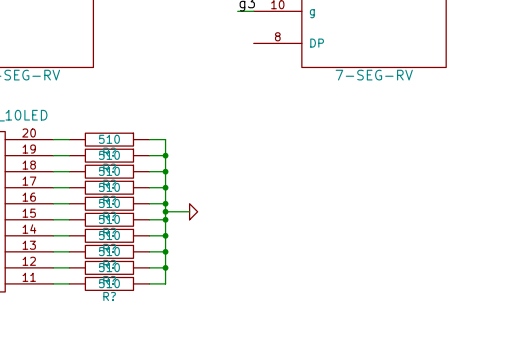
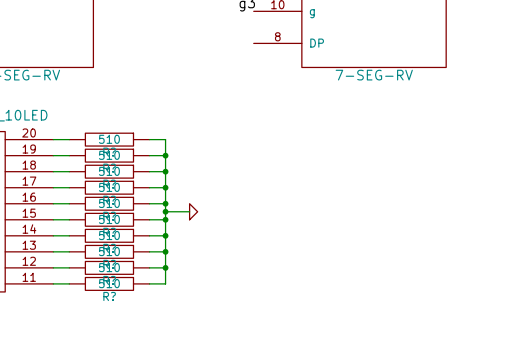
wire: (237, 11) (253, 11) -> none

